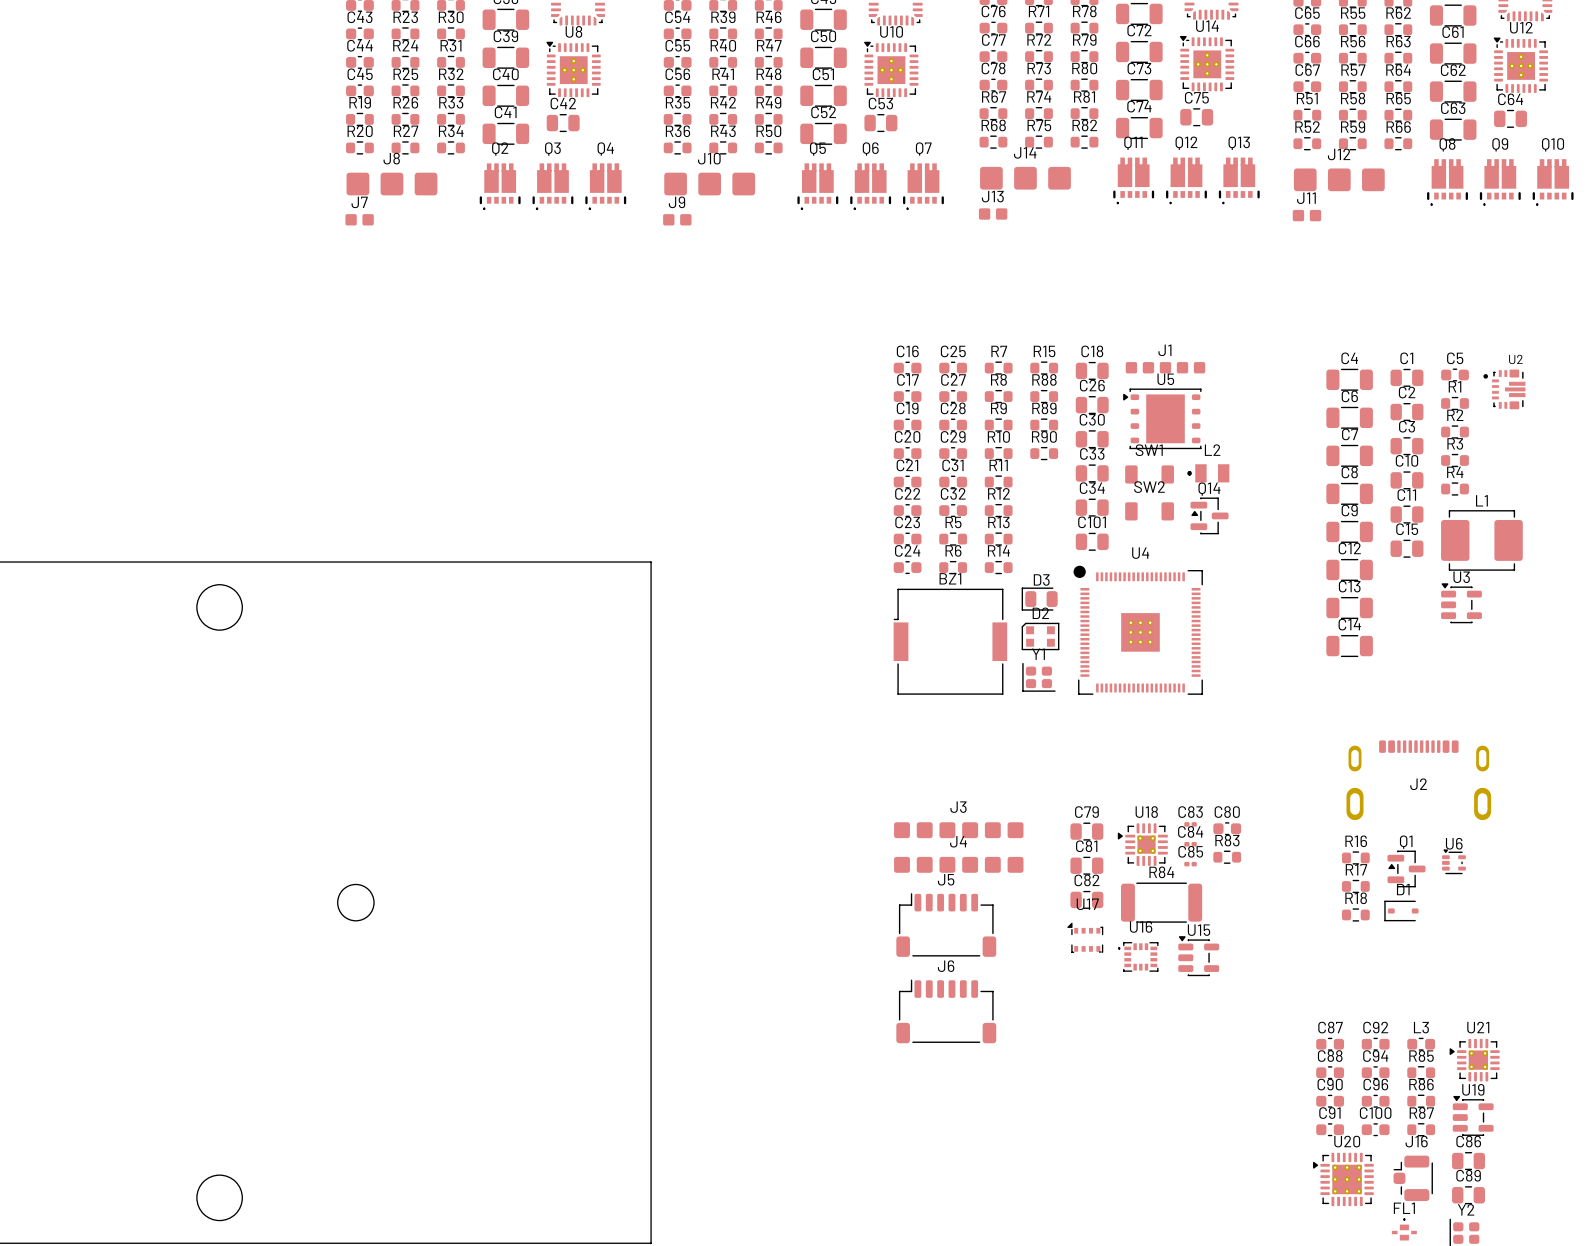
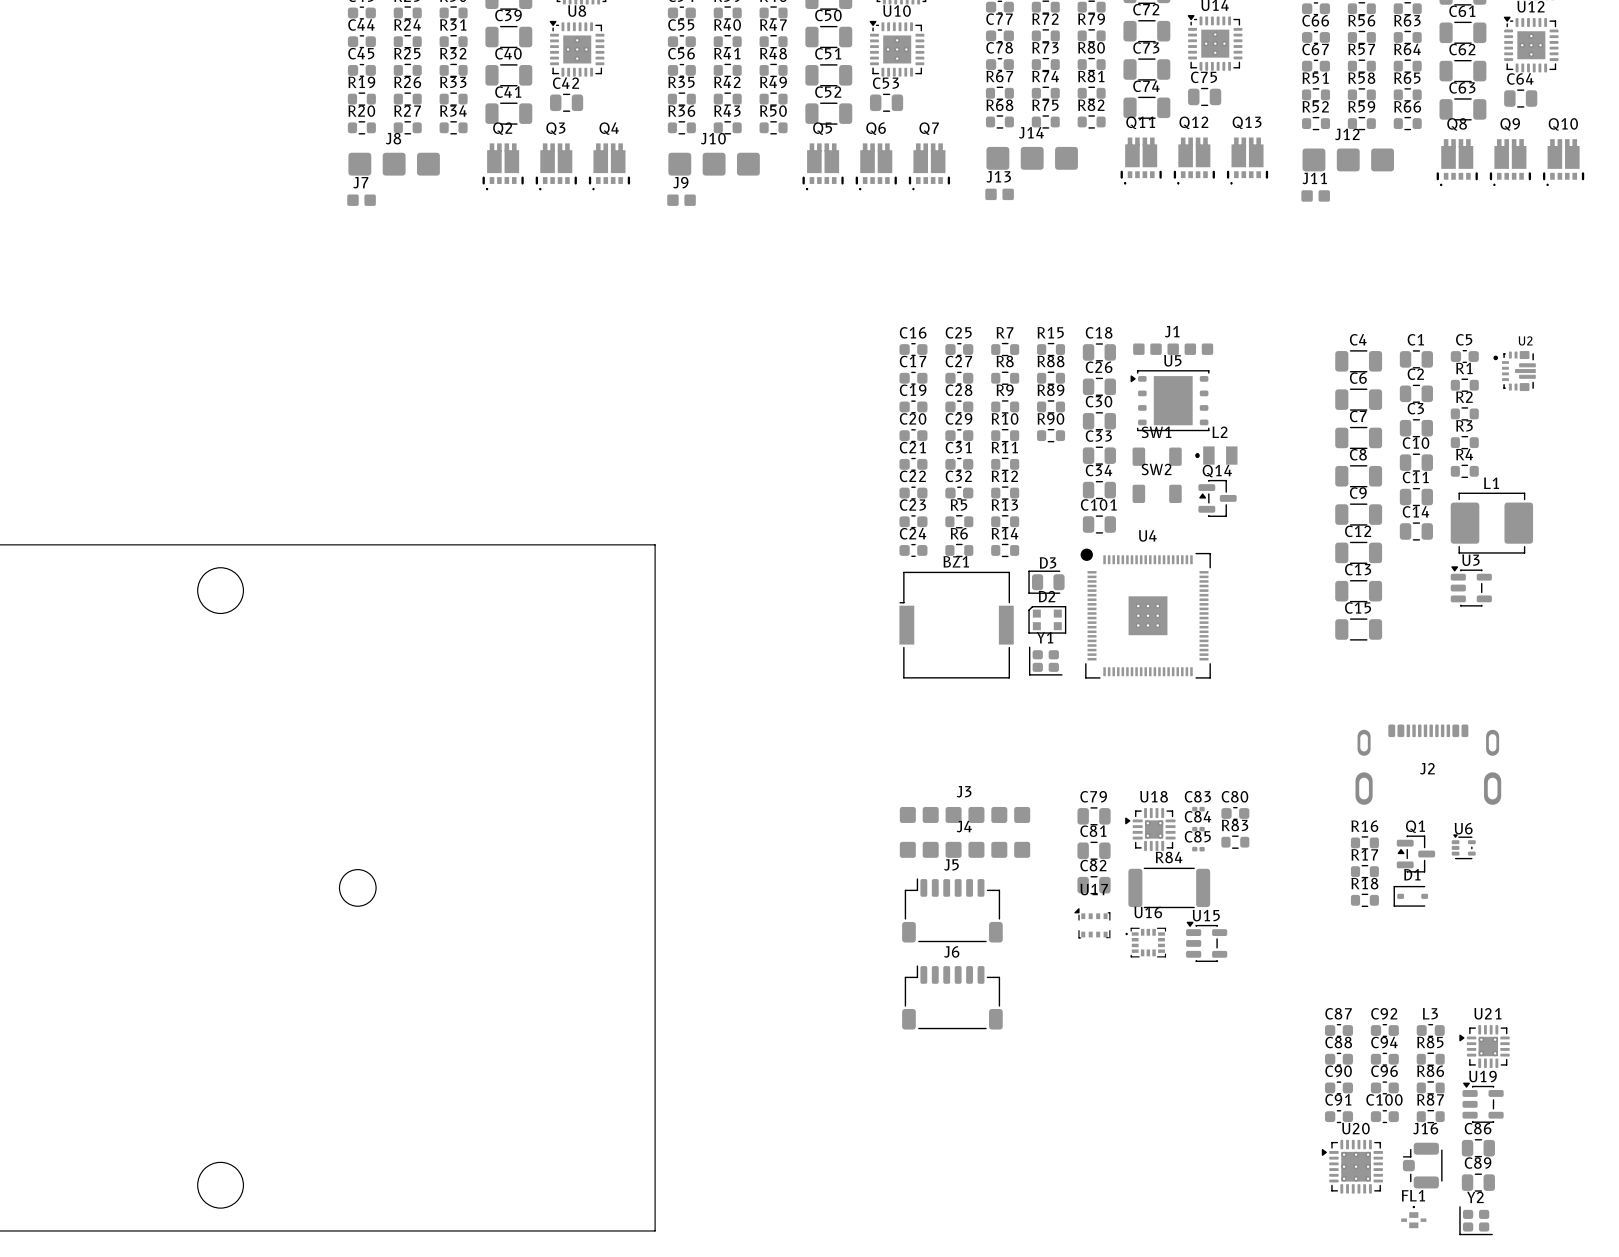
C15 name: C15 (1407, 529) -> C14 (1416, 511)
C14 name: C14 (1349, 624) -> C15 (1358, 607)

